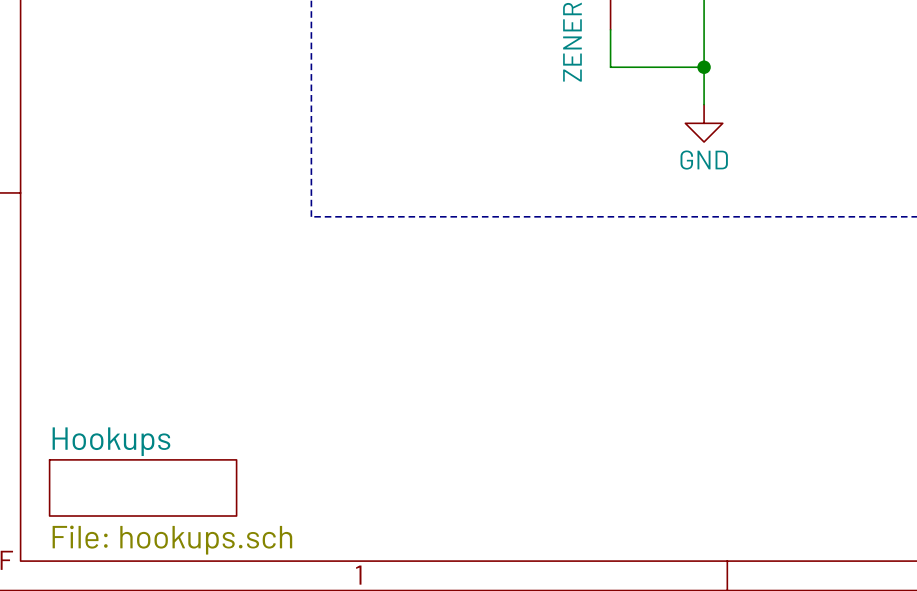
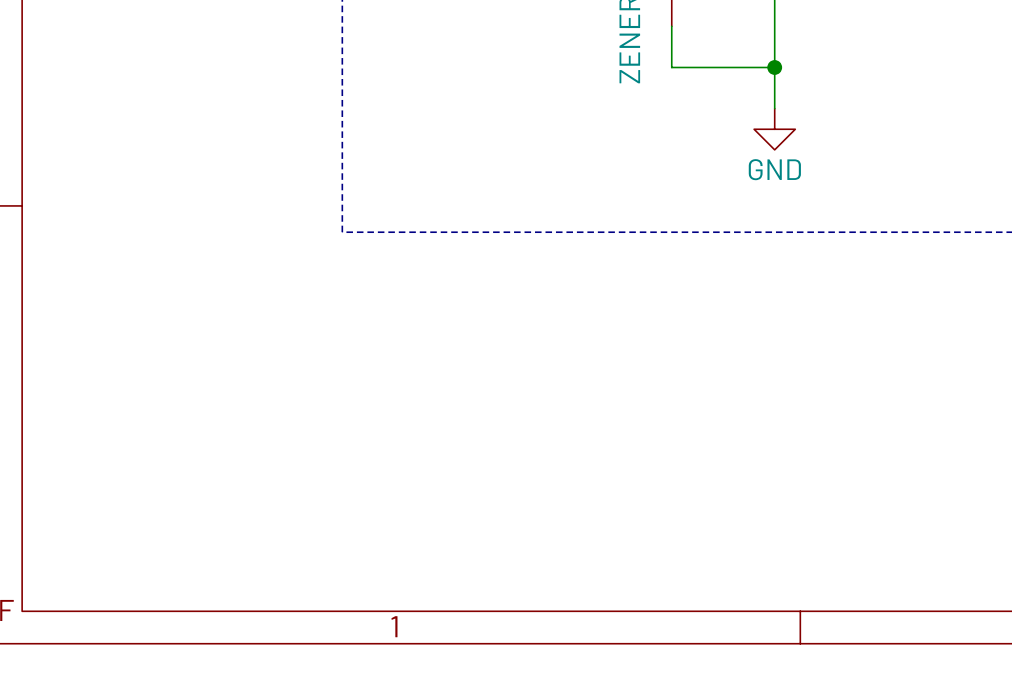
sheet Hookups: File: hookups.sch (143, 487) -> none

